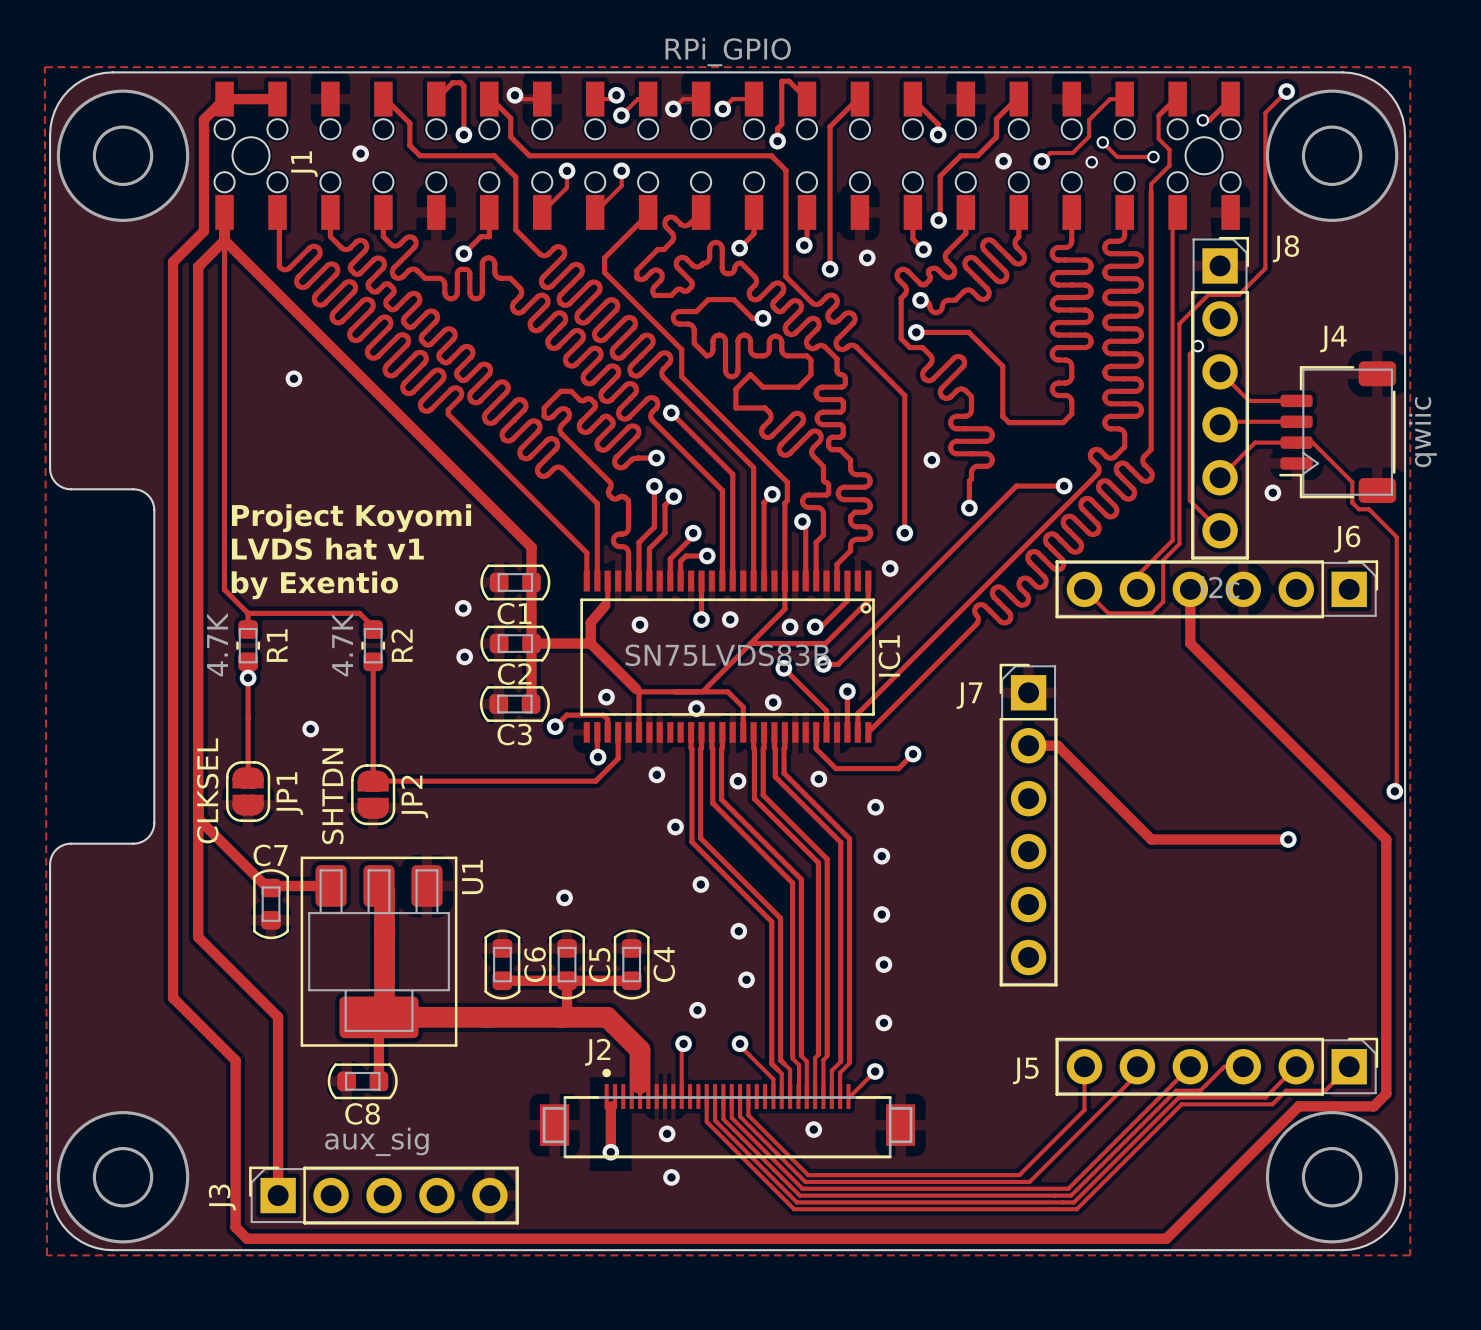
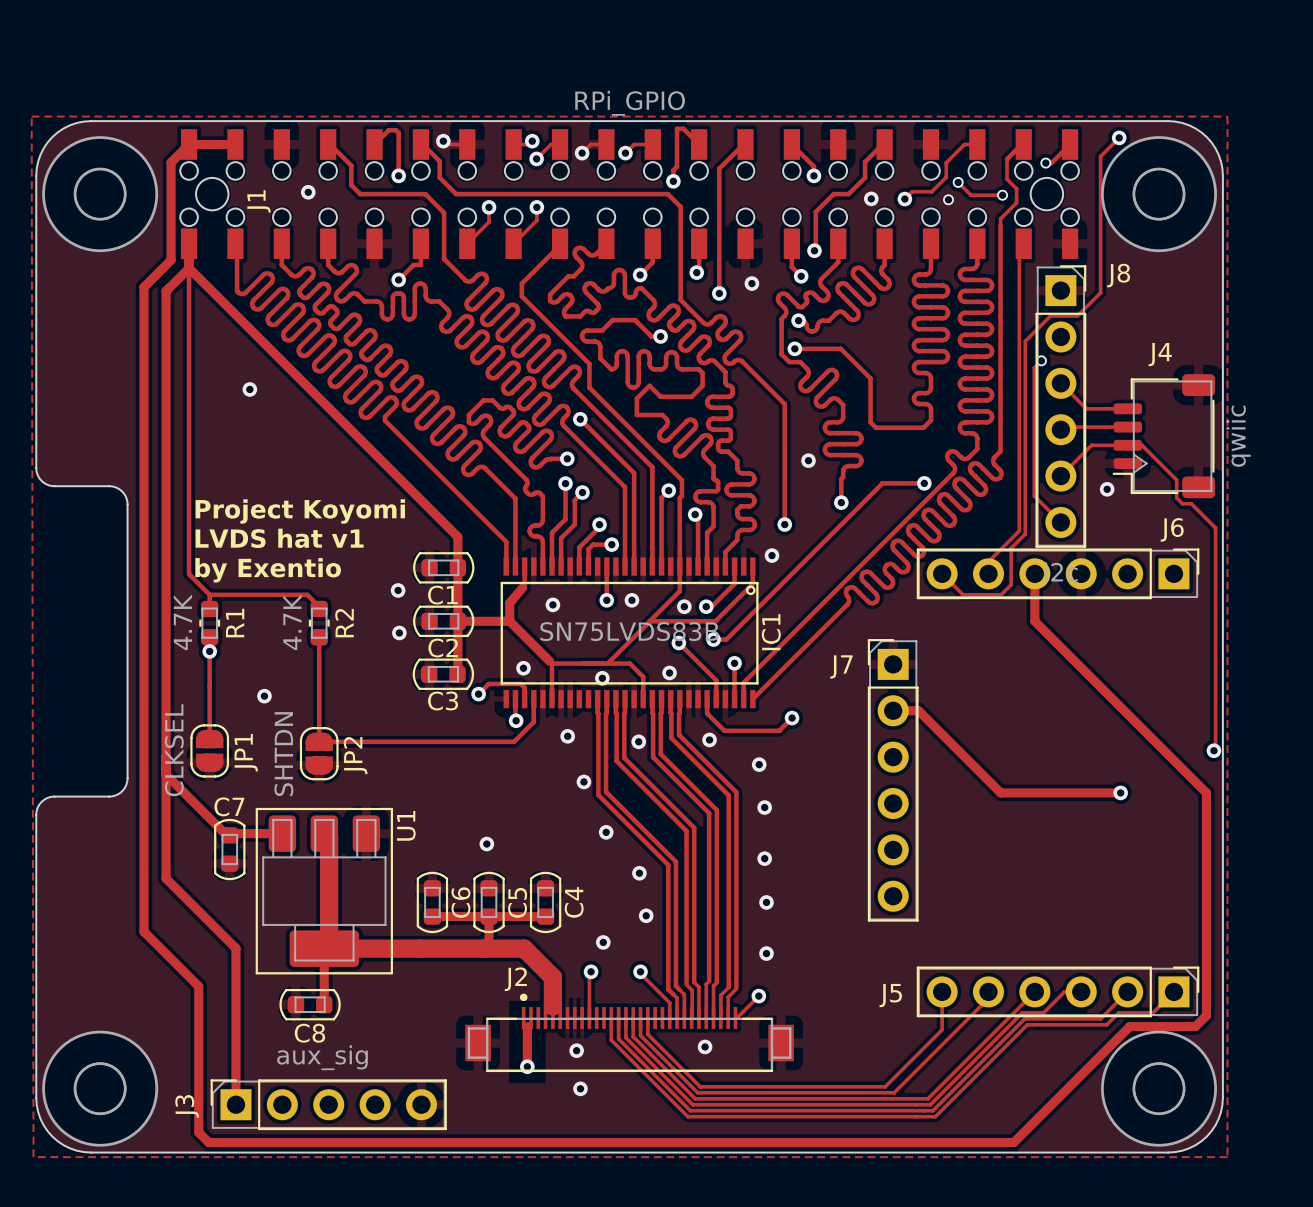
JP1 value: none -> CLKSEL (174, 750)
text: CLKSEL (207, 790) -> none
JP2 value: none -> SHTDN (283, 754)
text: SHTDN (332, 796) -> none

